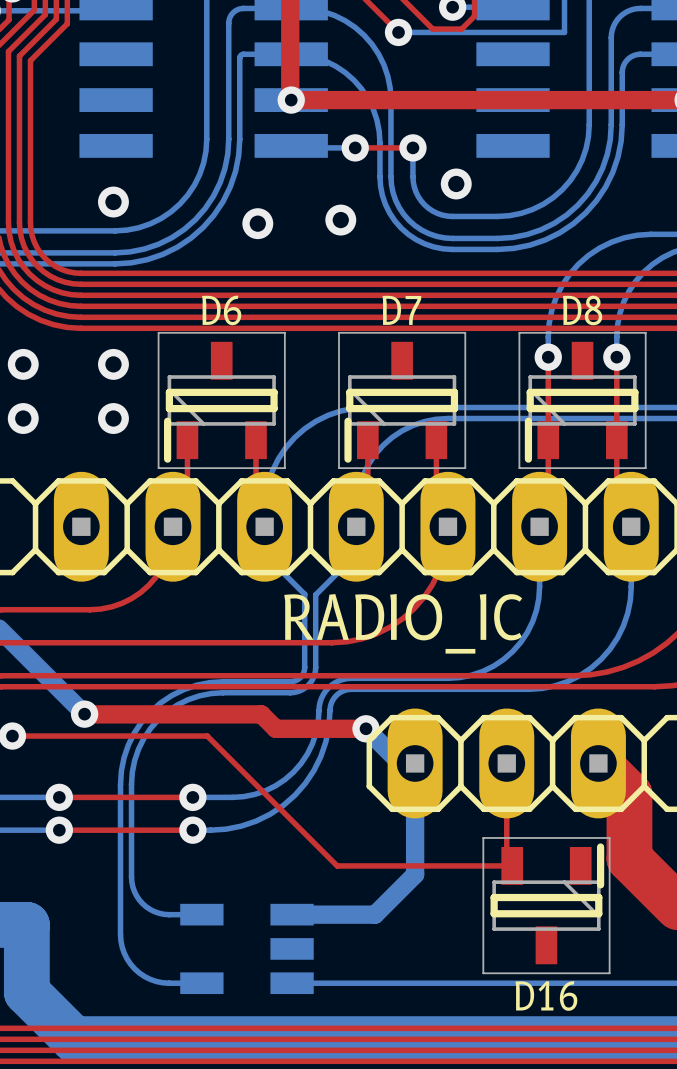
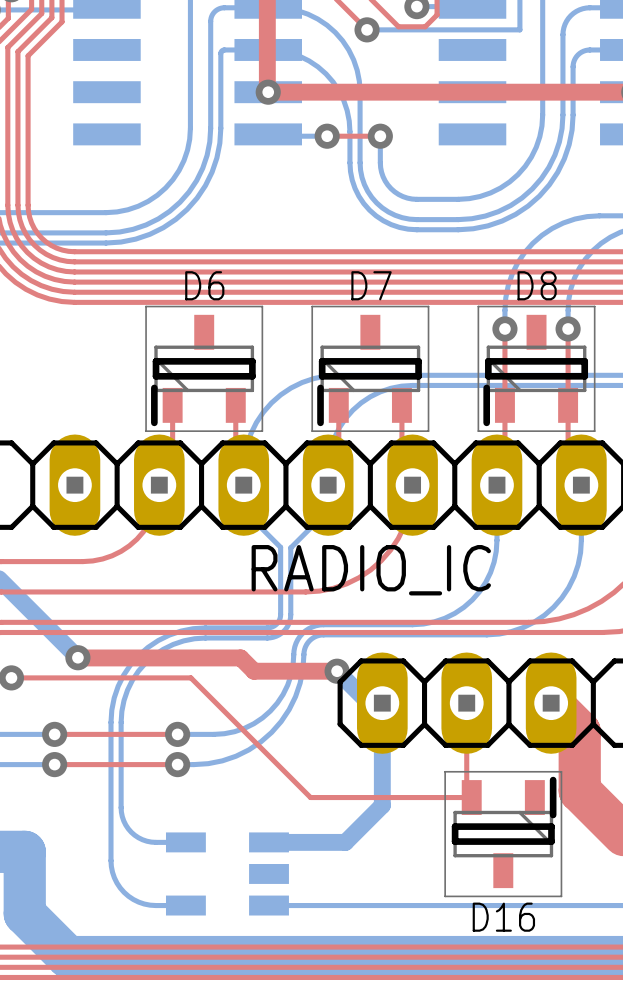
via: (456, 183) -> none
via: (113, 202) -> none
via: (340, 220) -> none
via: (257, 223) -> none
via: (23, 364) -> none
via: (113, 364) -> none
via: (23, 418) -> none
via: (113, 418) -> none

